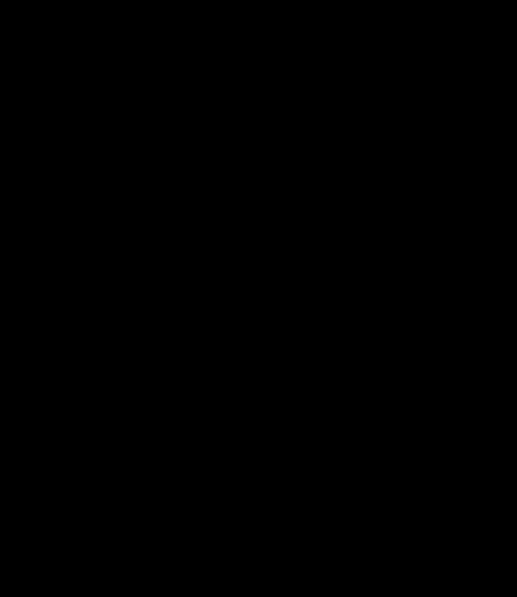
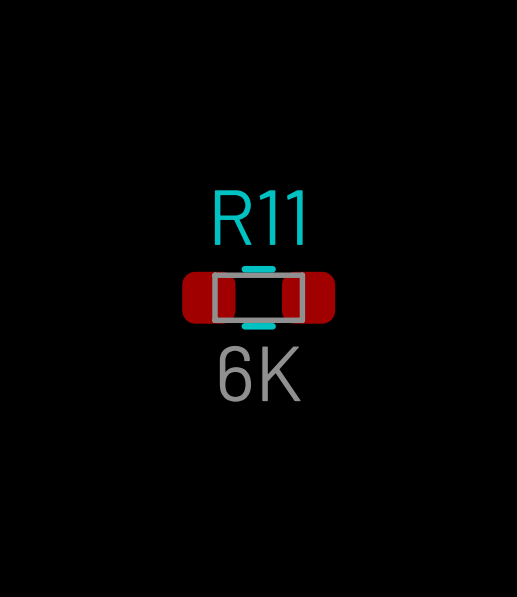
R11: none -> 6K (258, 297)

